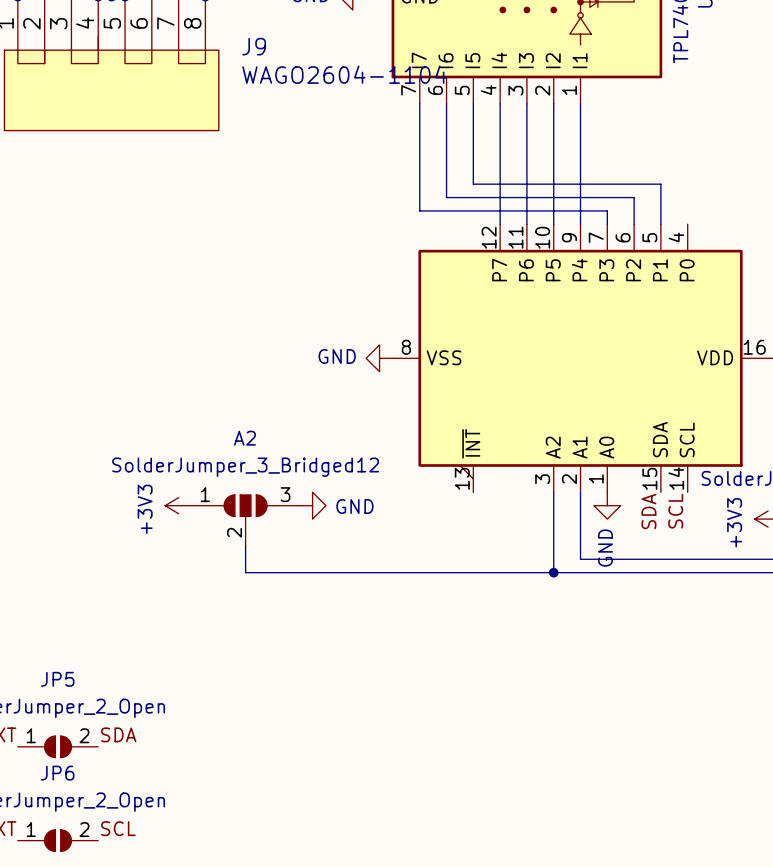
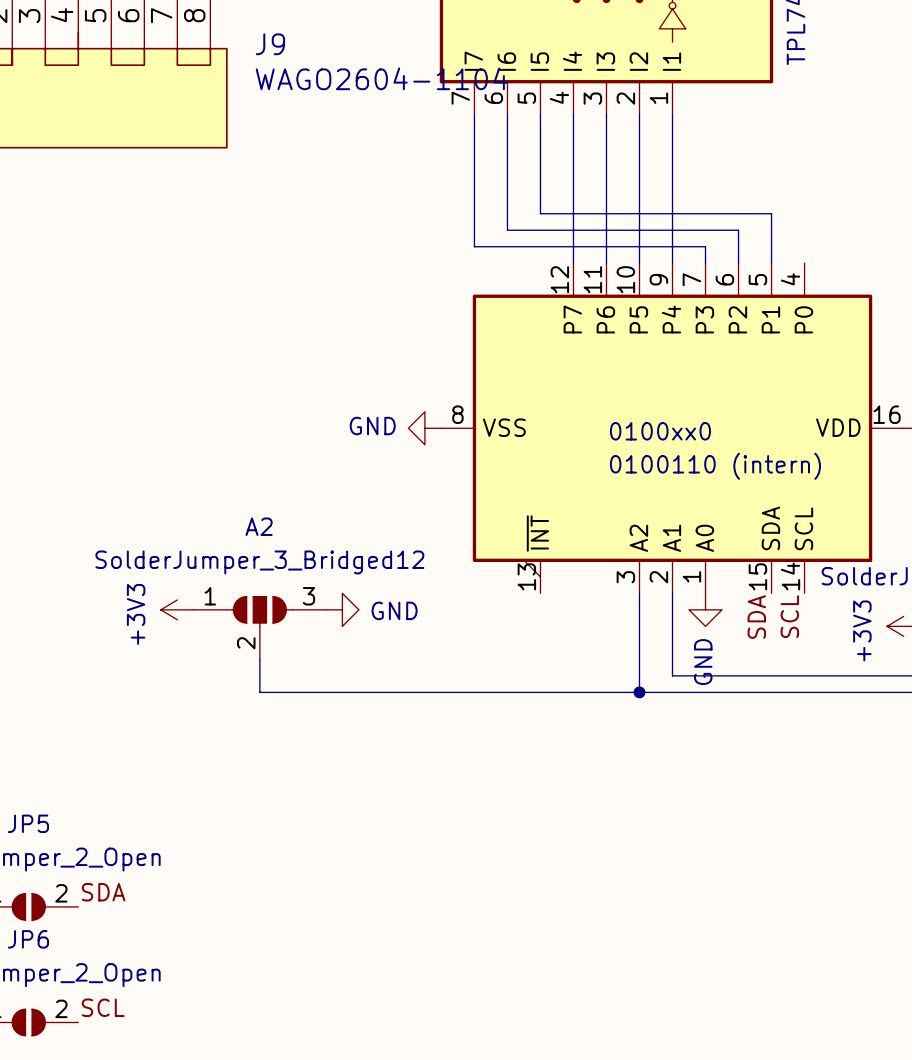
text: none -> 0100xx0 (660, 431)
text: none -> 0100110 (intern) (715, 466)

